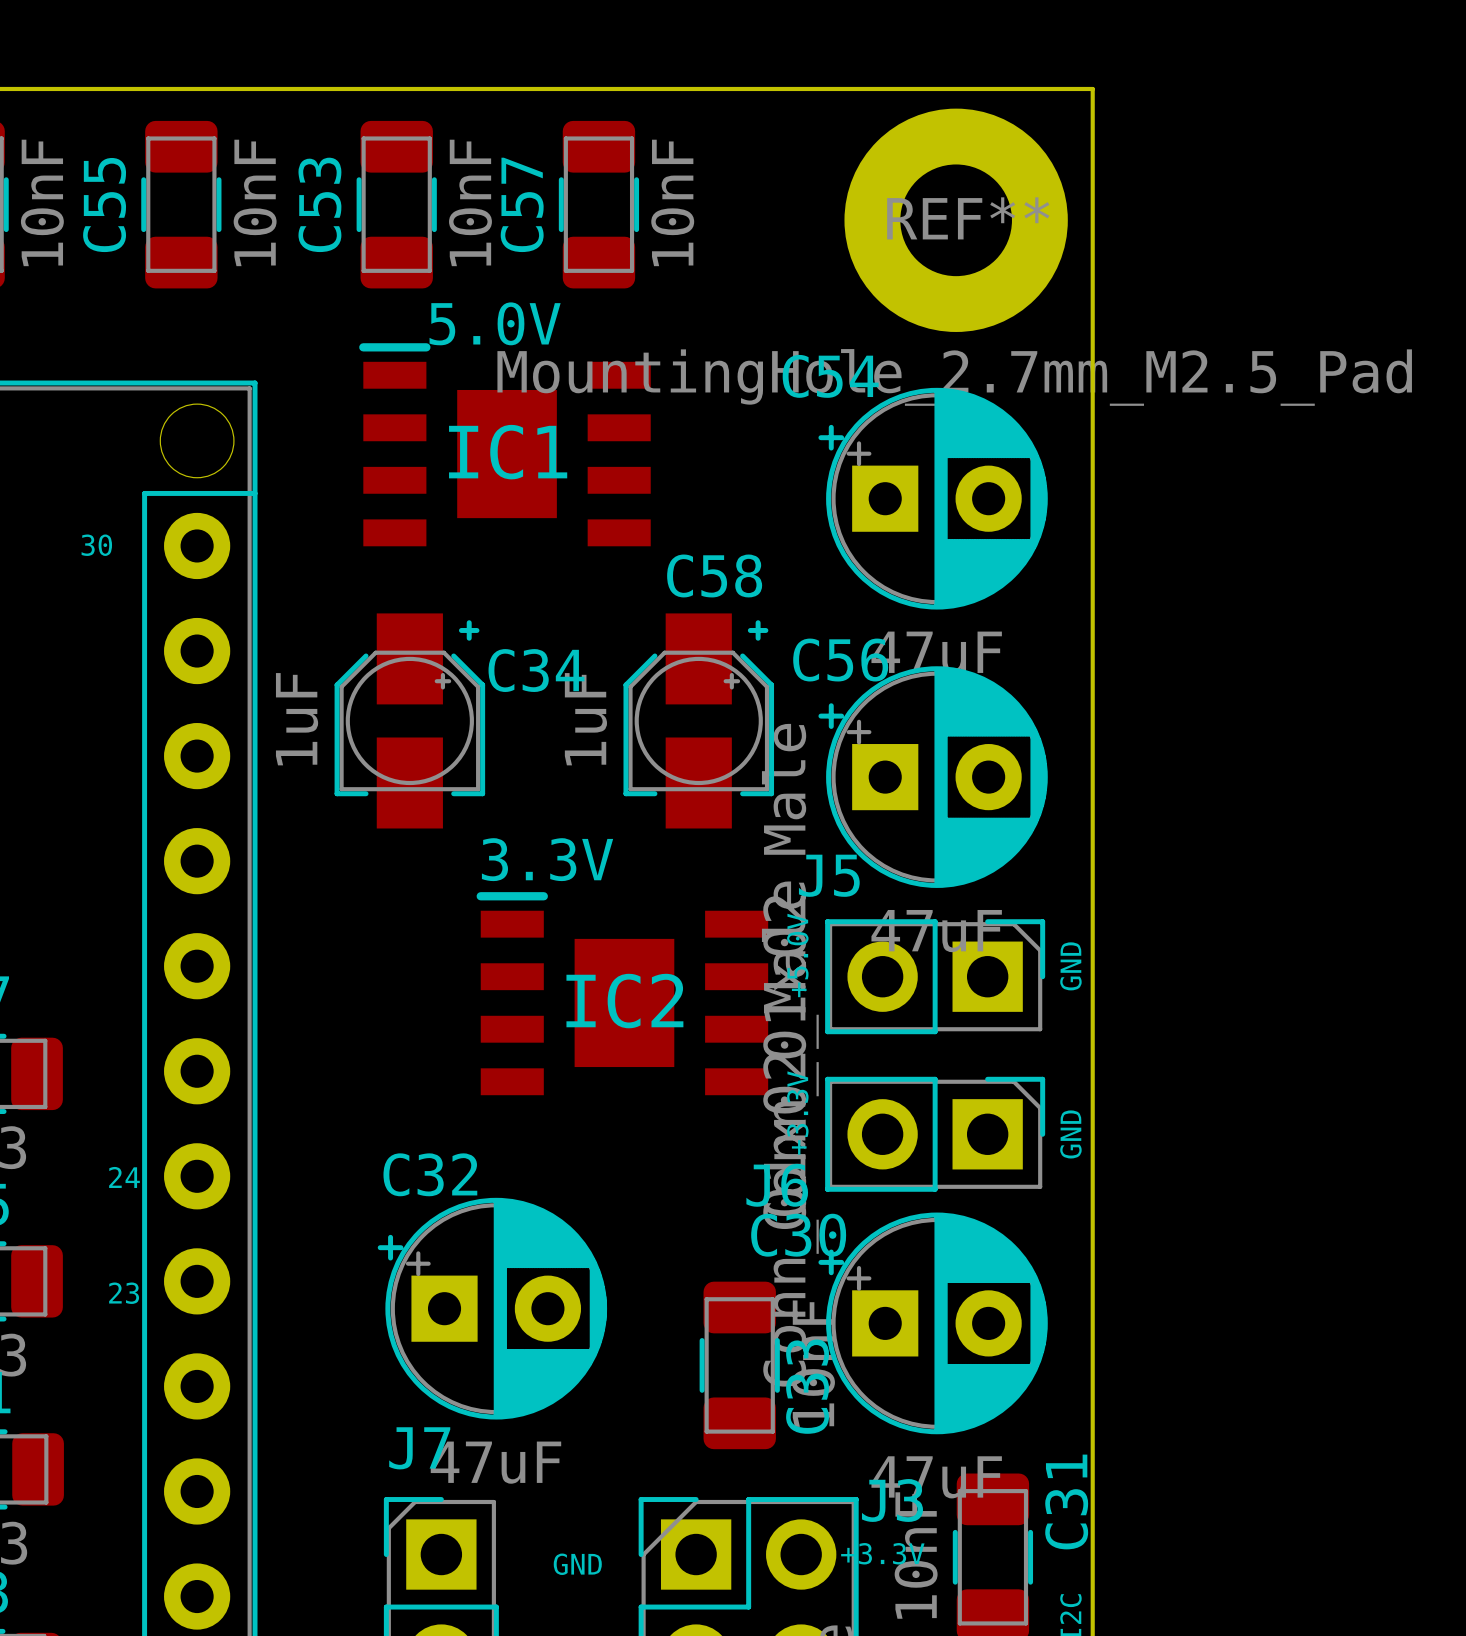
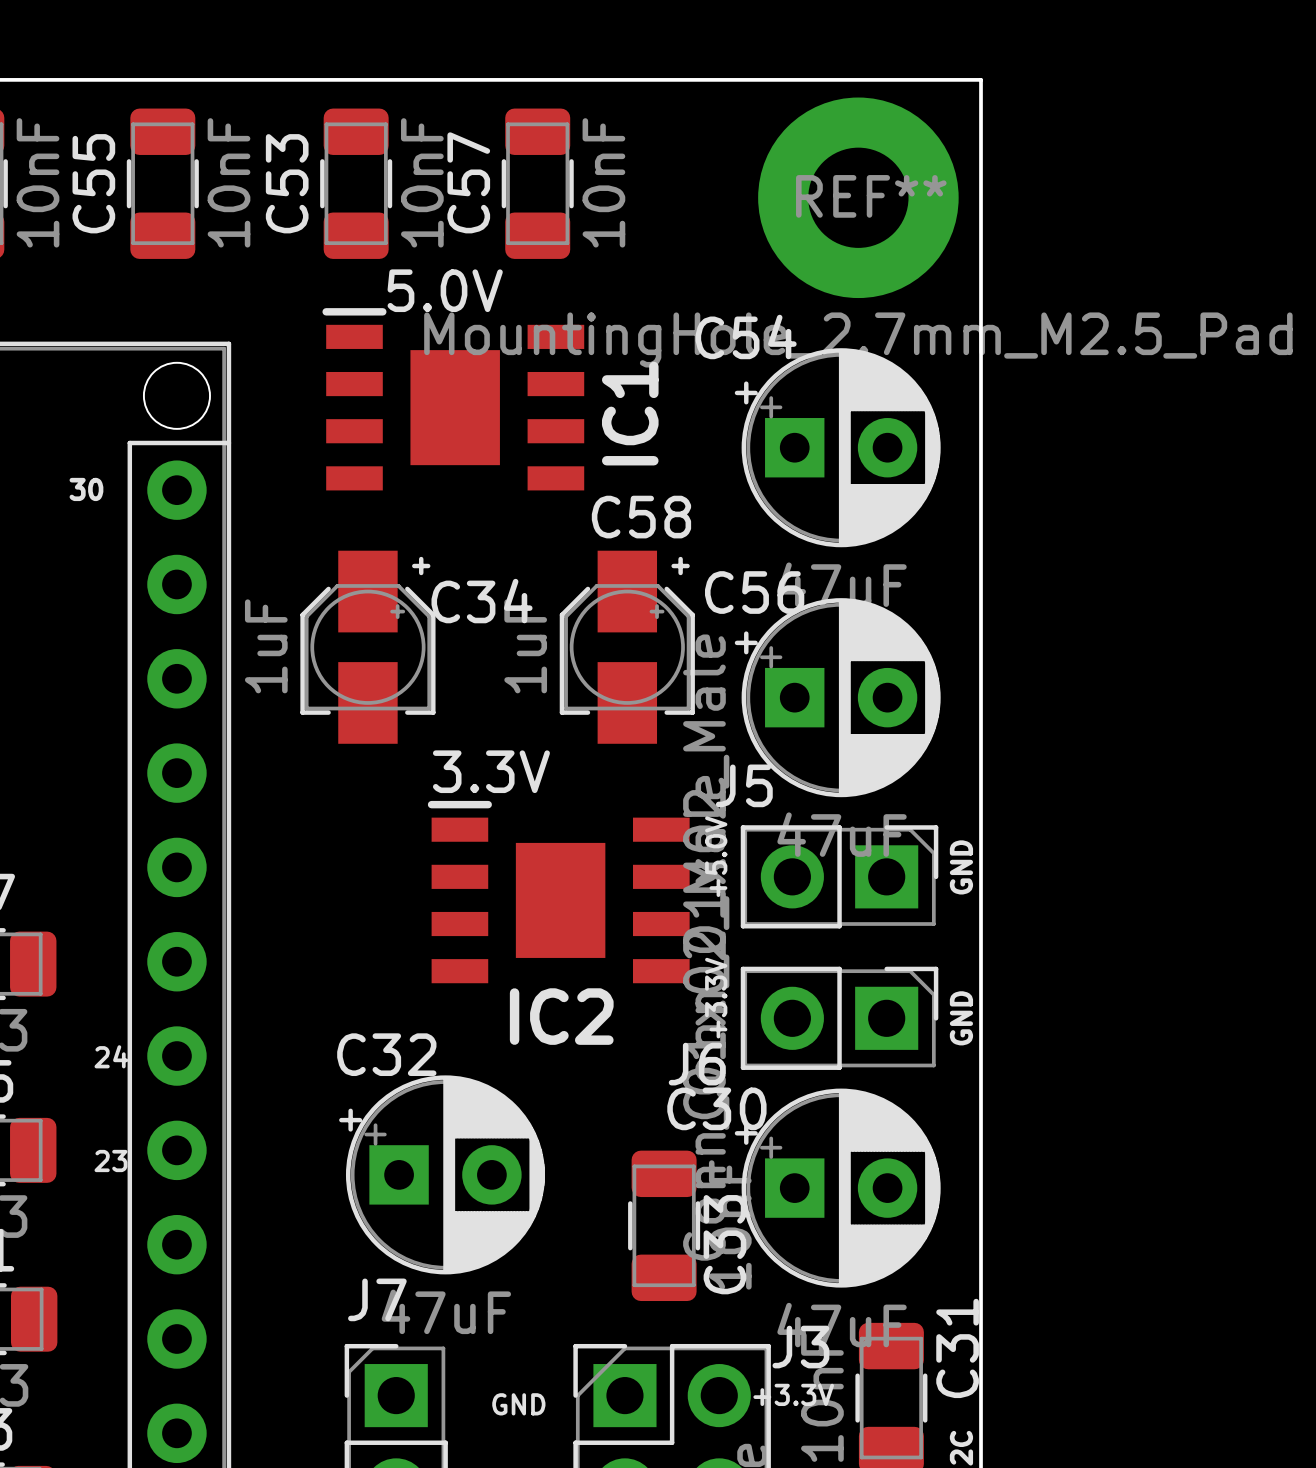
IC1 name rotation: 0° (508, 452) -> 90° counterclockwise (630, 413)
IC1 name position: IC1 (508, 452) -> IC1 (630, 413)
IC2 name position: IC2 (624, 1001) -> IC2 (561, 1016)

